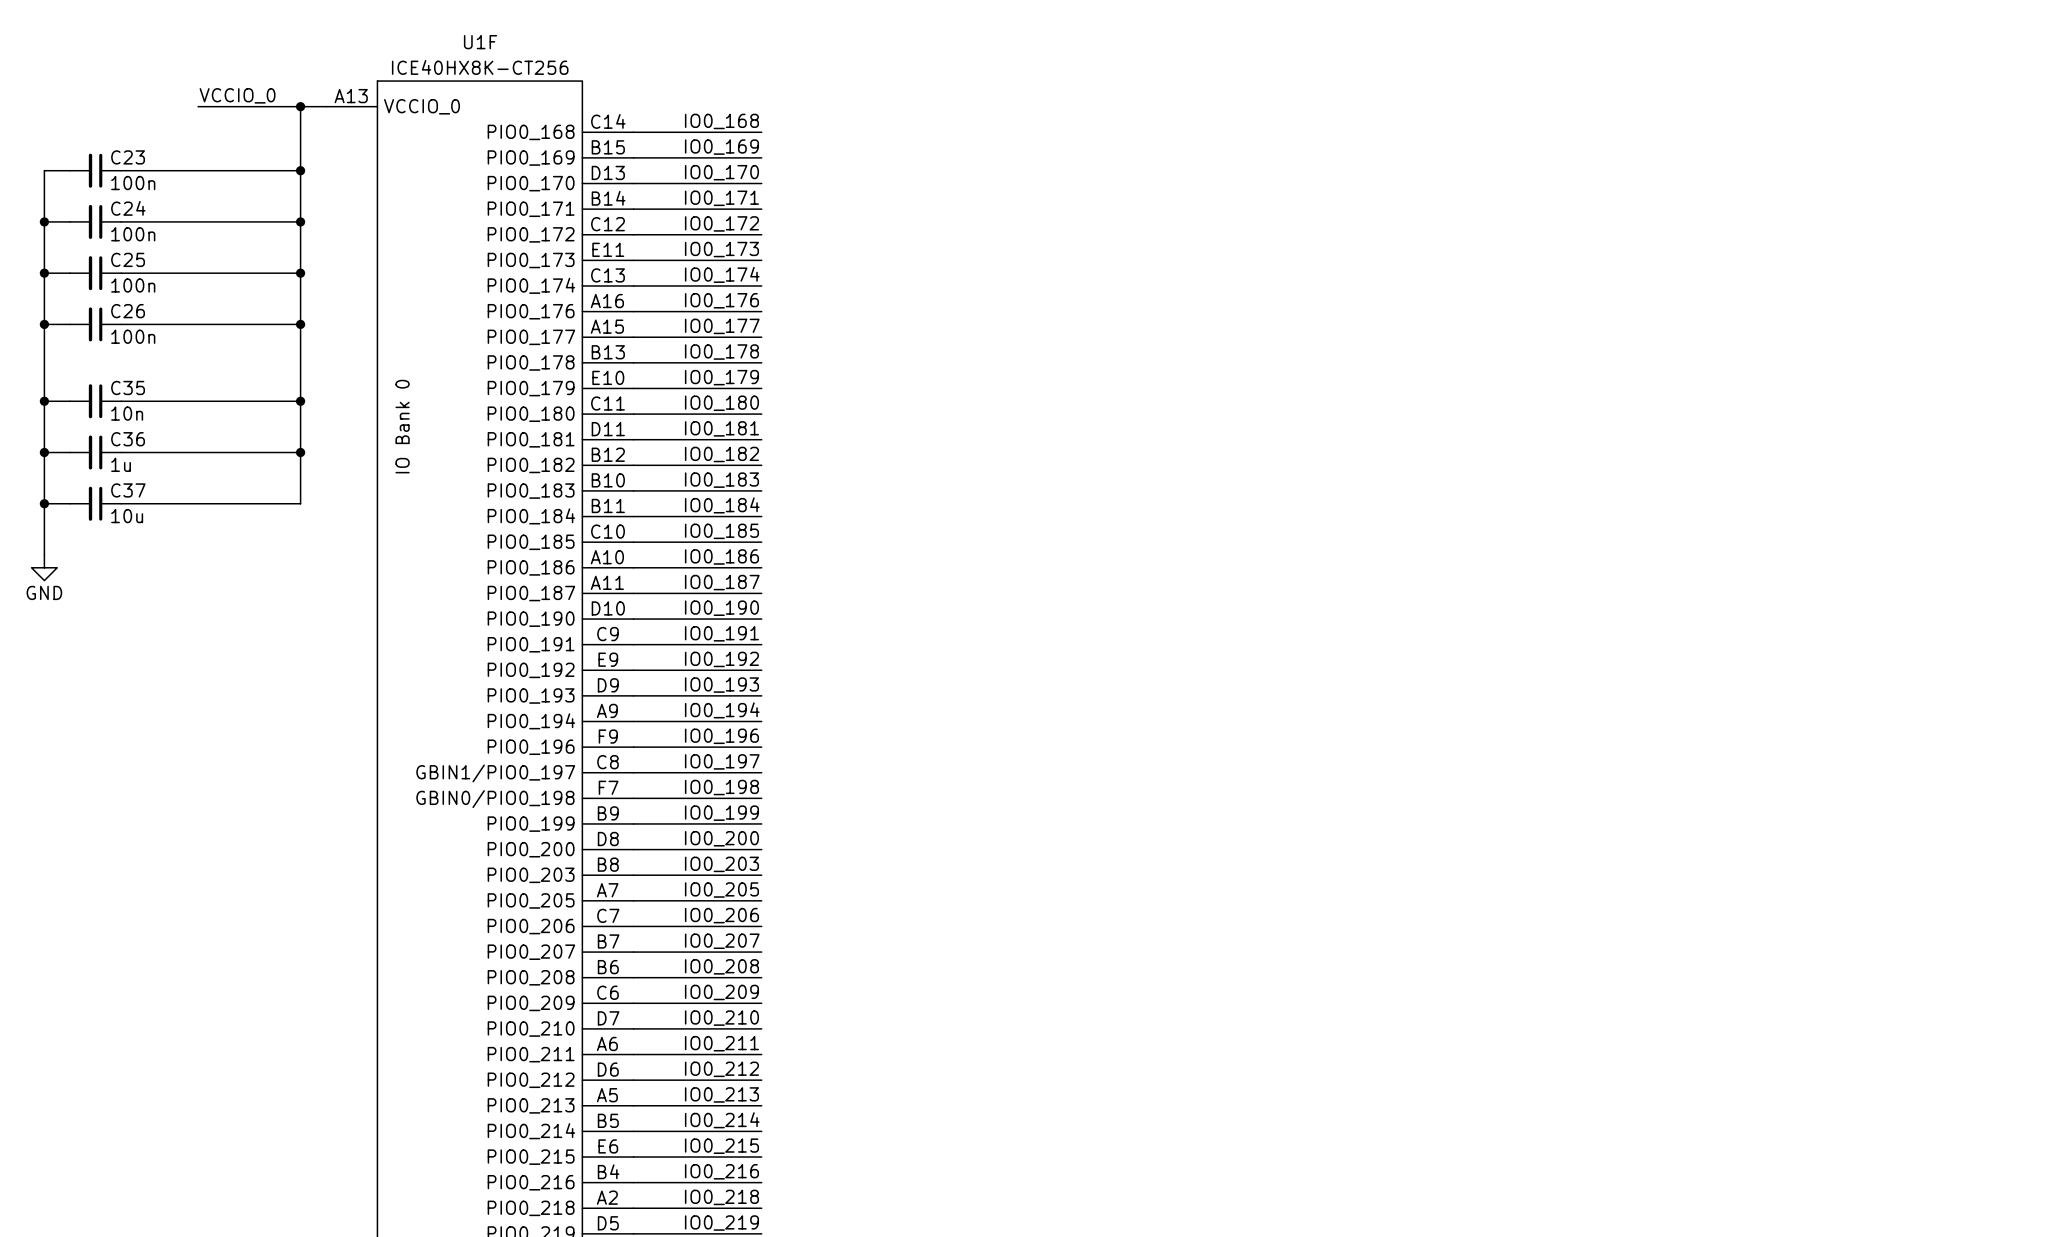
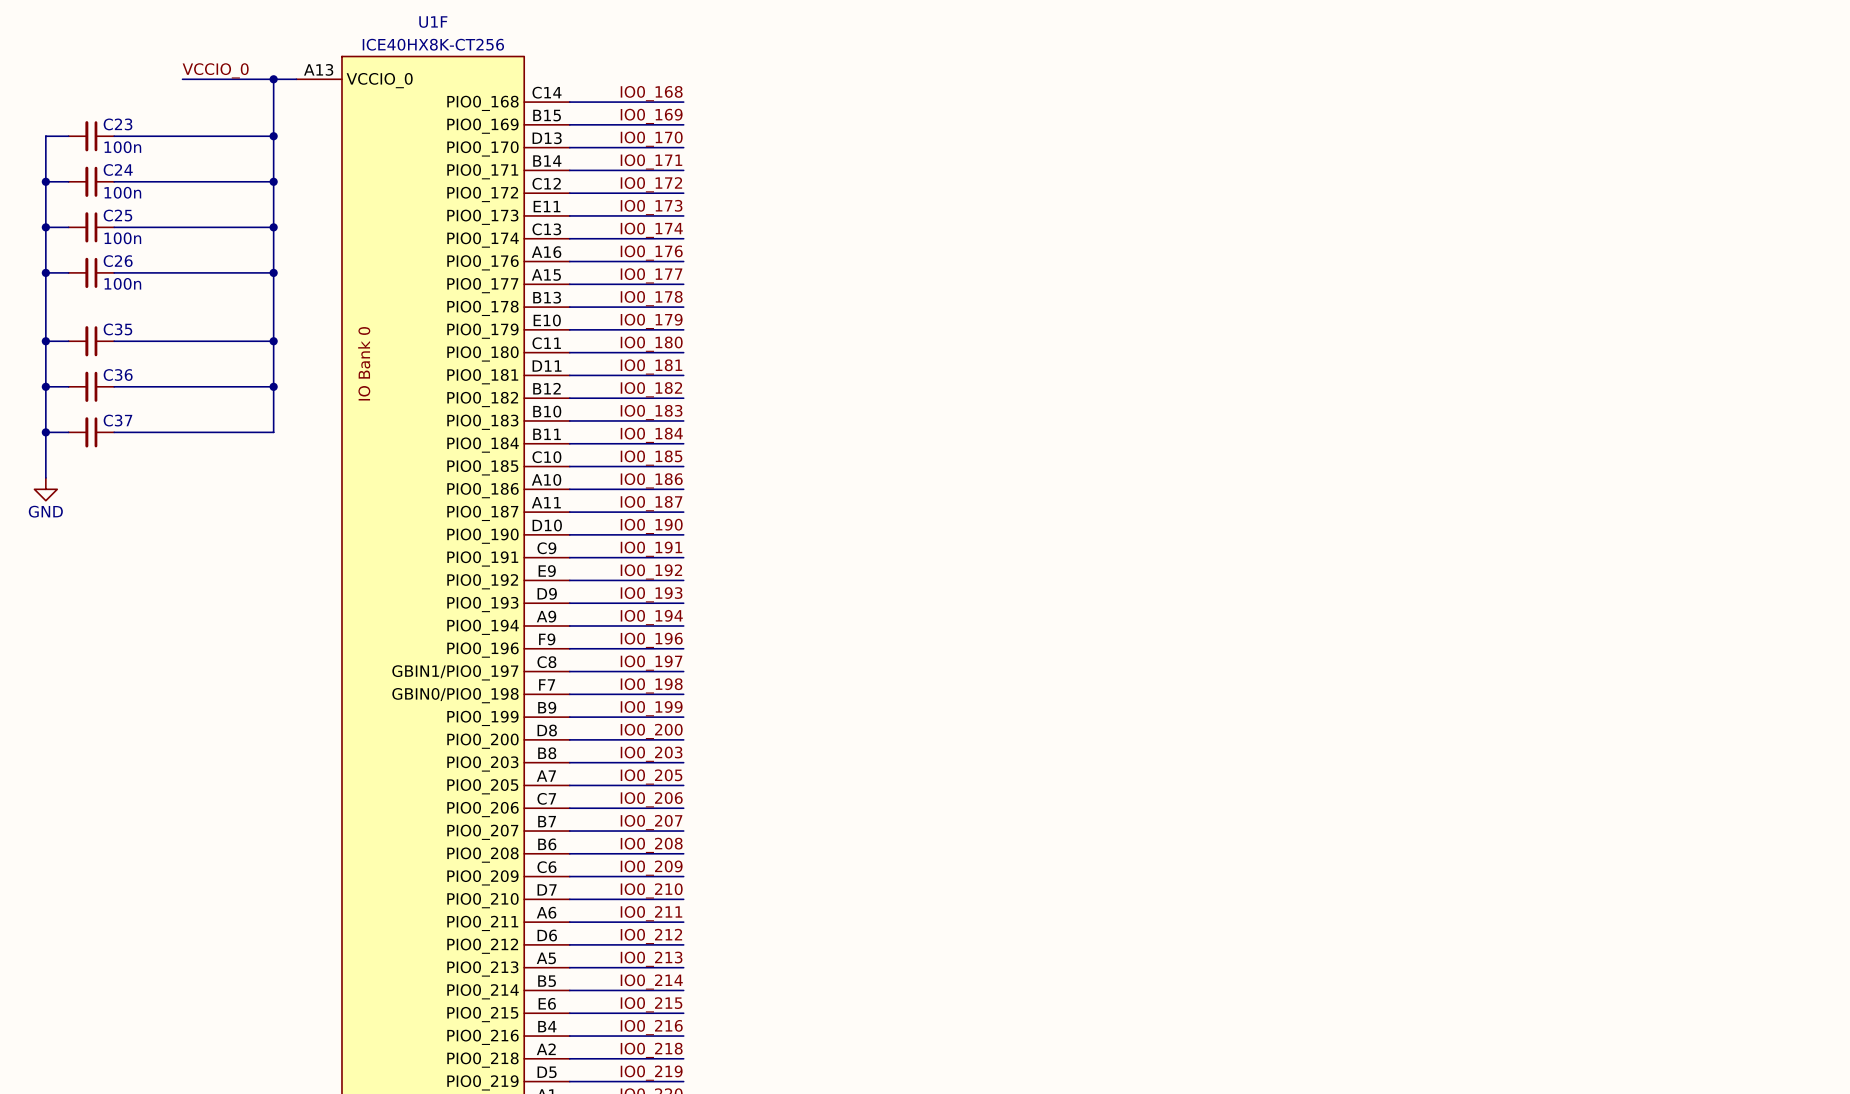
C35 value: 10n (127, 413) -> none
C36 value: 1u (121, 464) -> none
C37 value: 10u (127, 516) -> none

